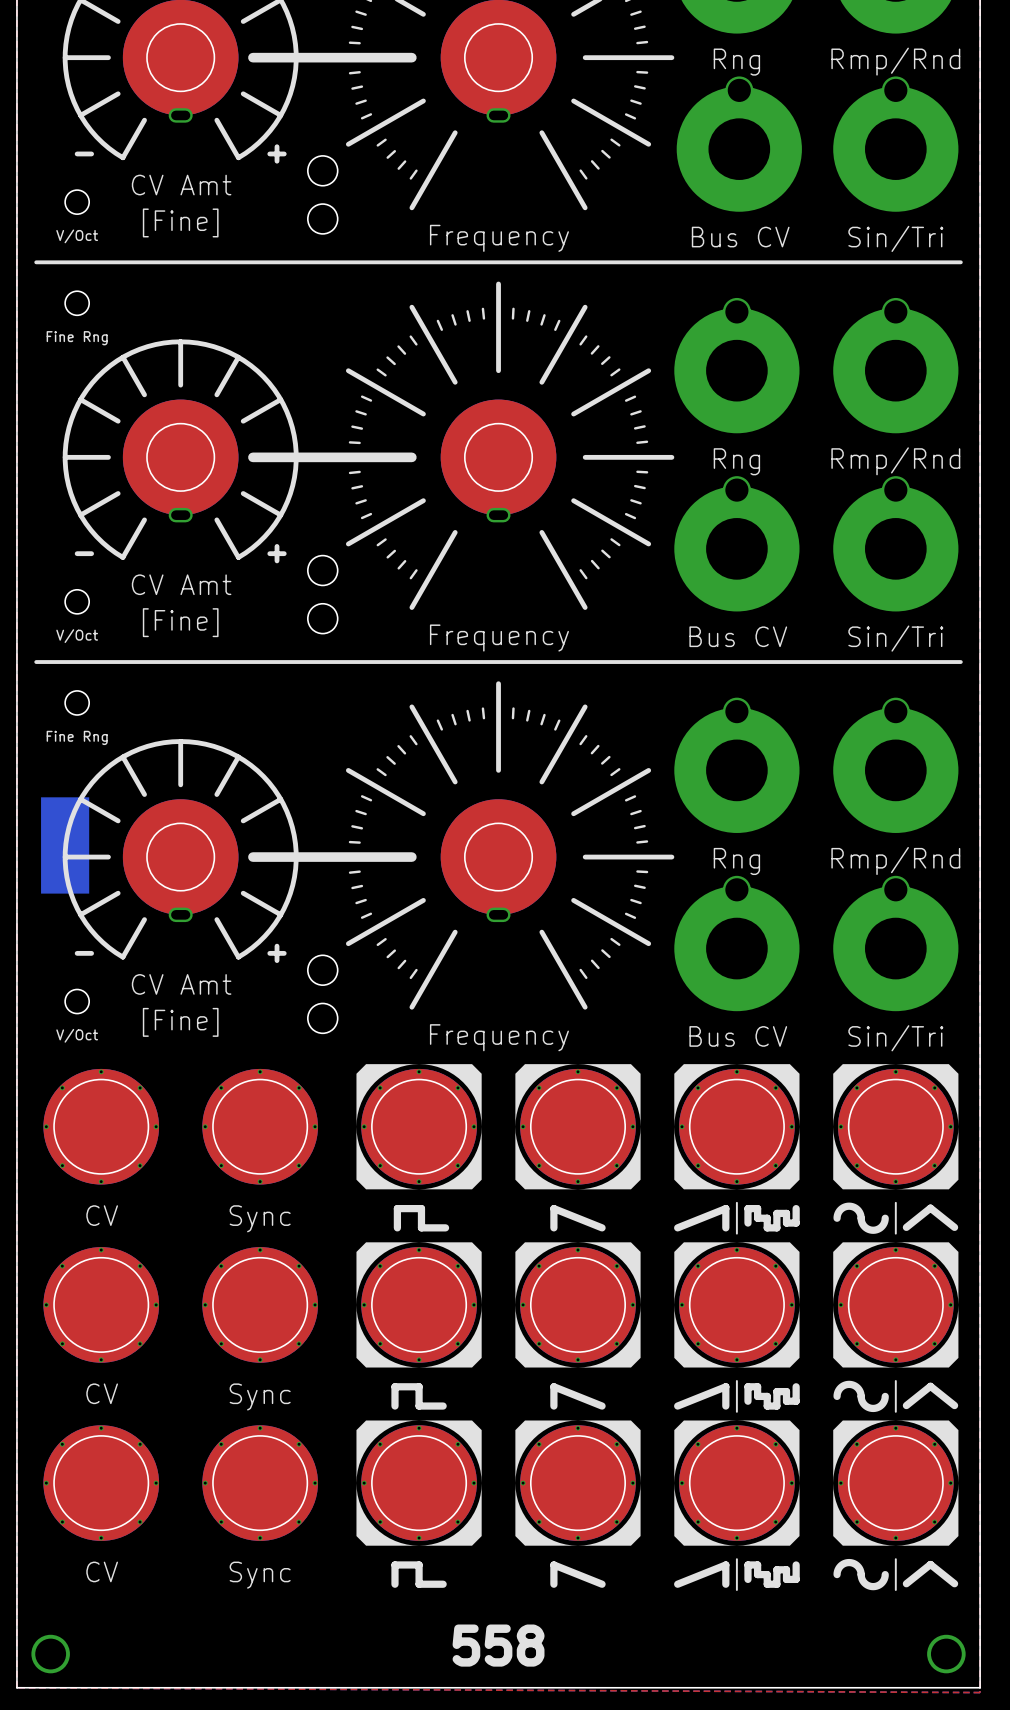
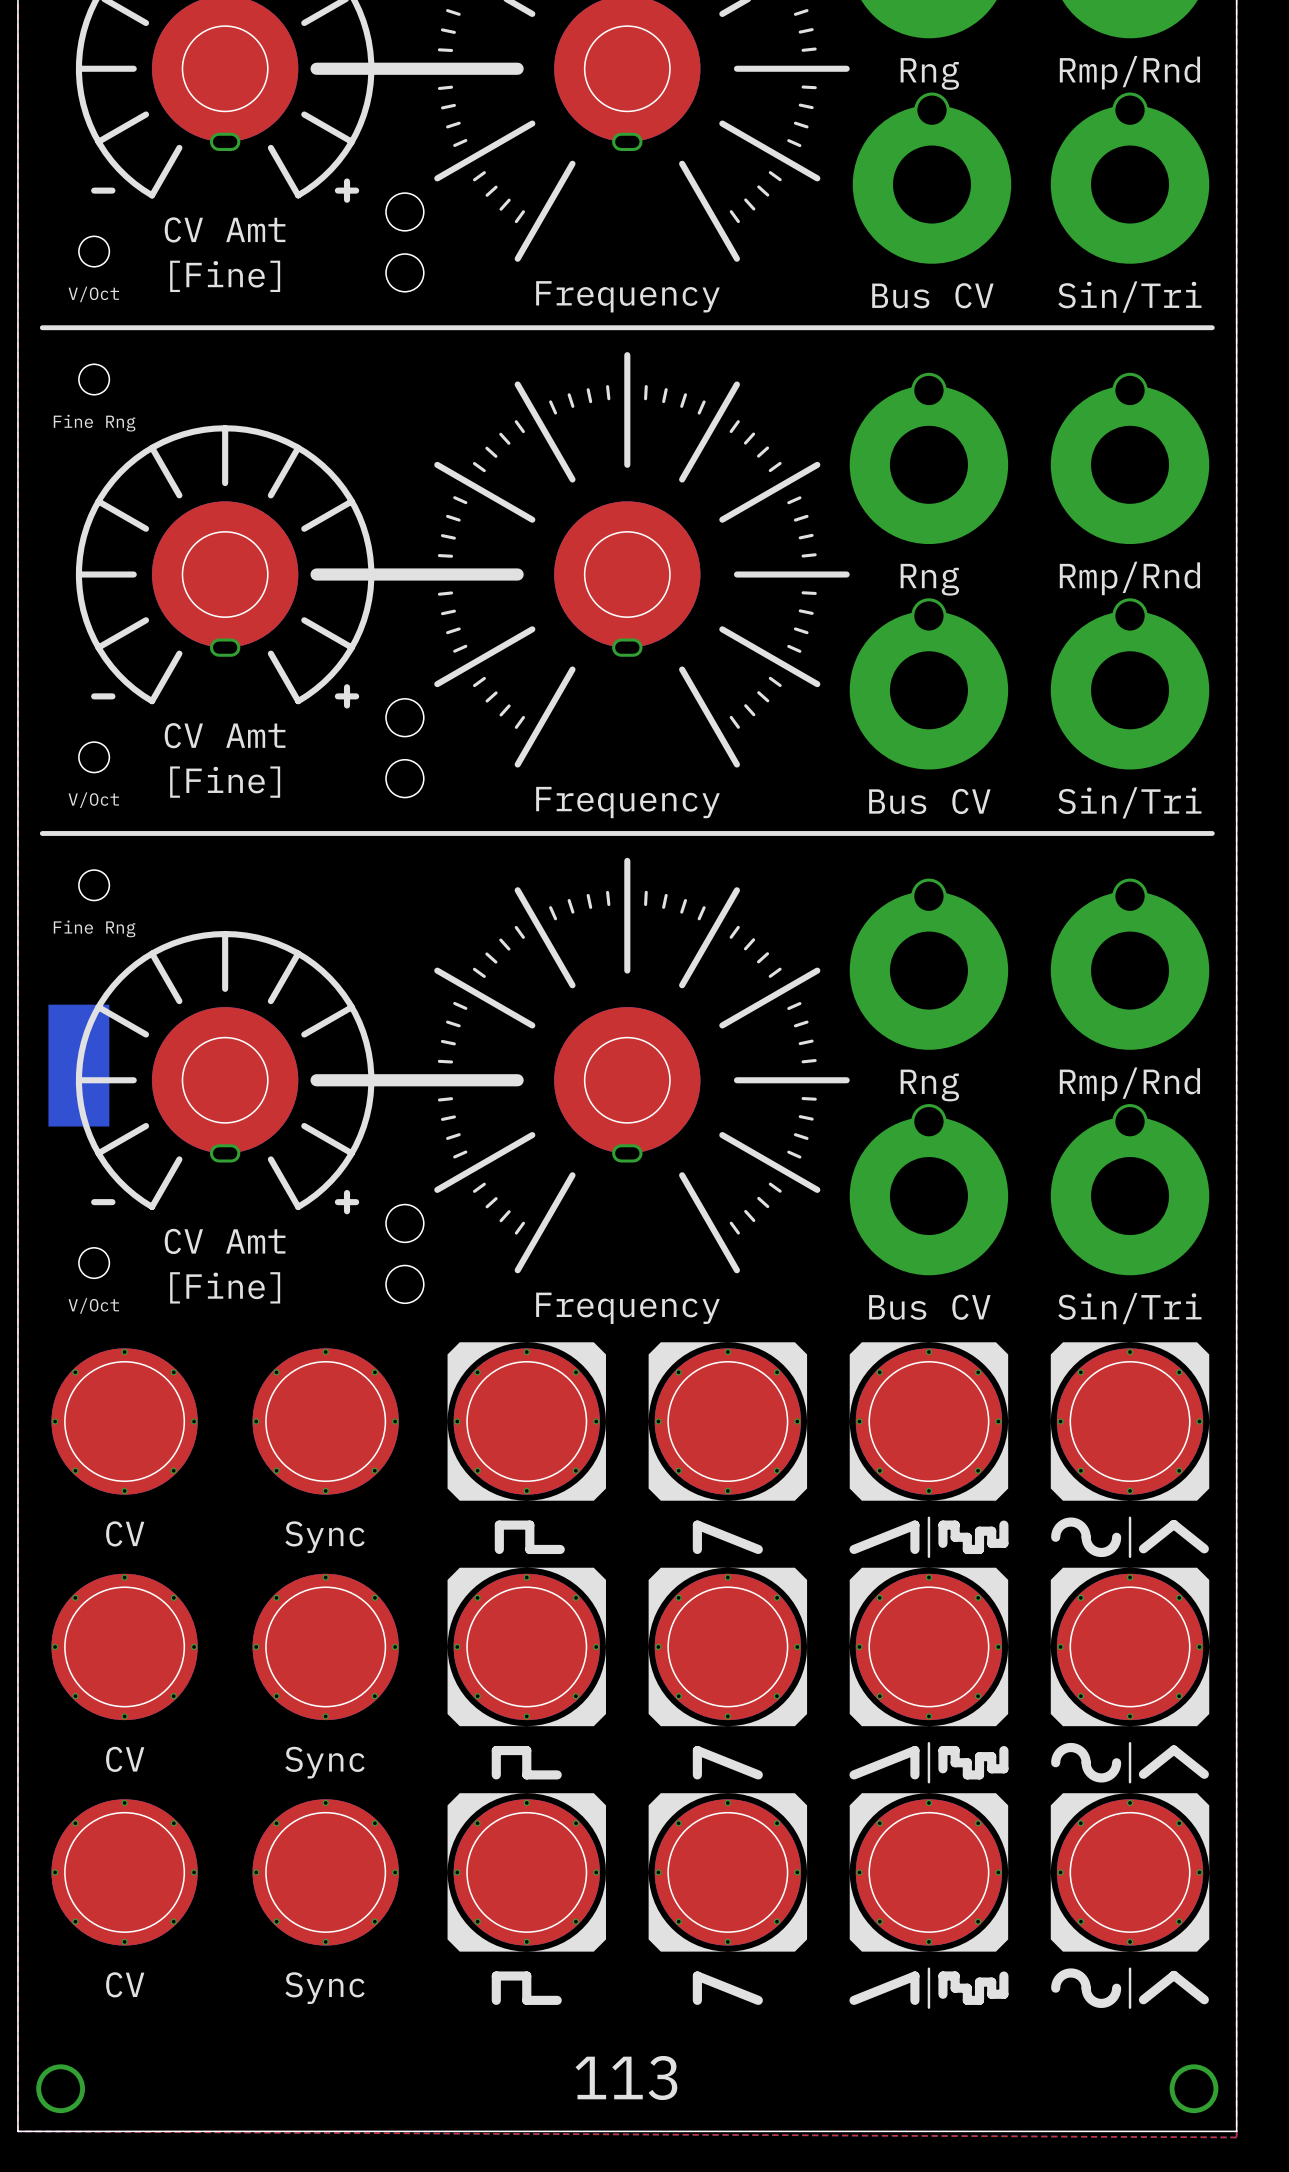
text: 558 (498, 1645) -> 113 (626, 2077)

